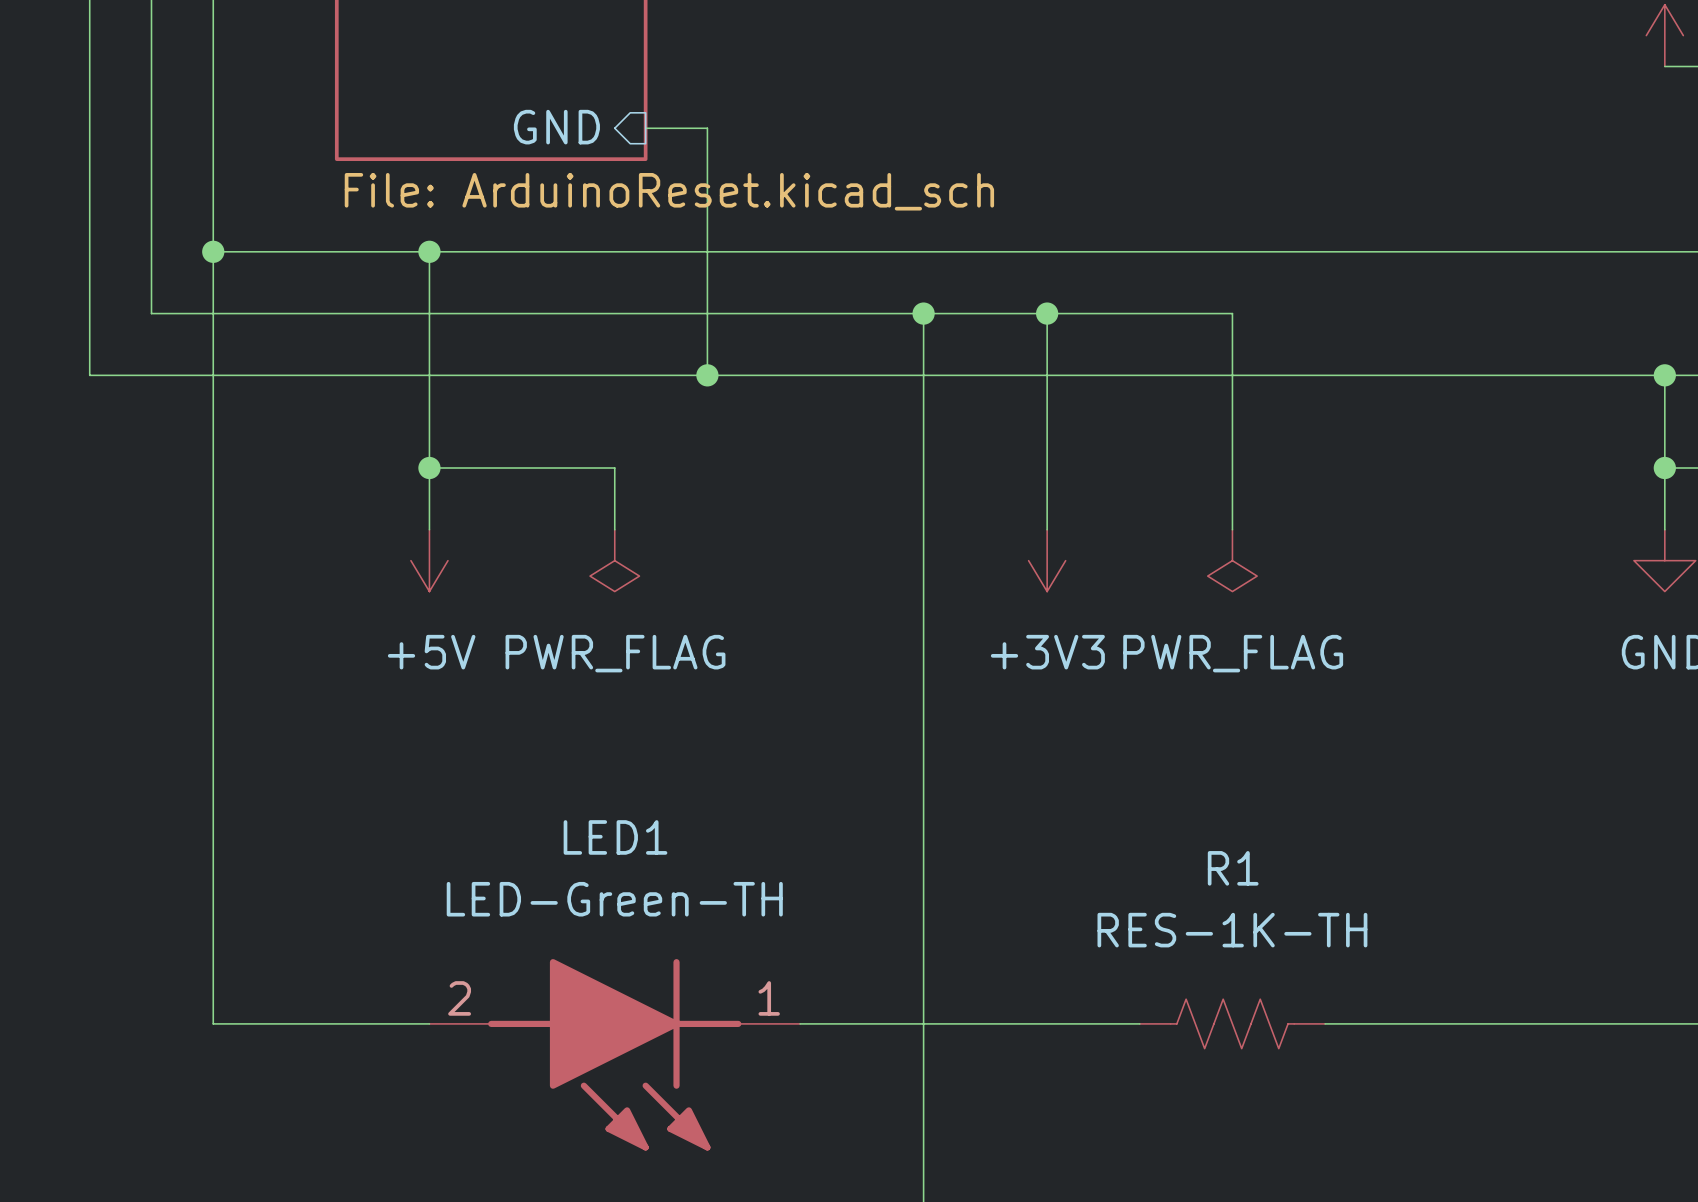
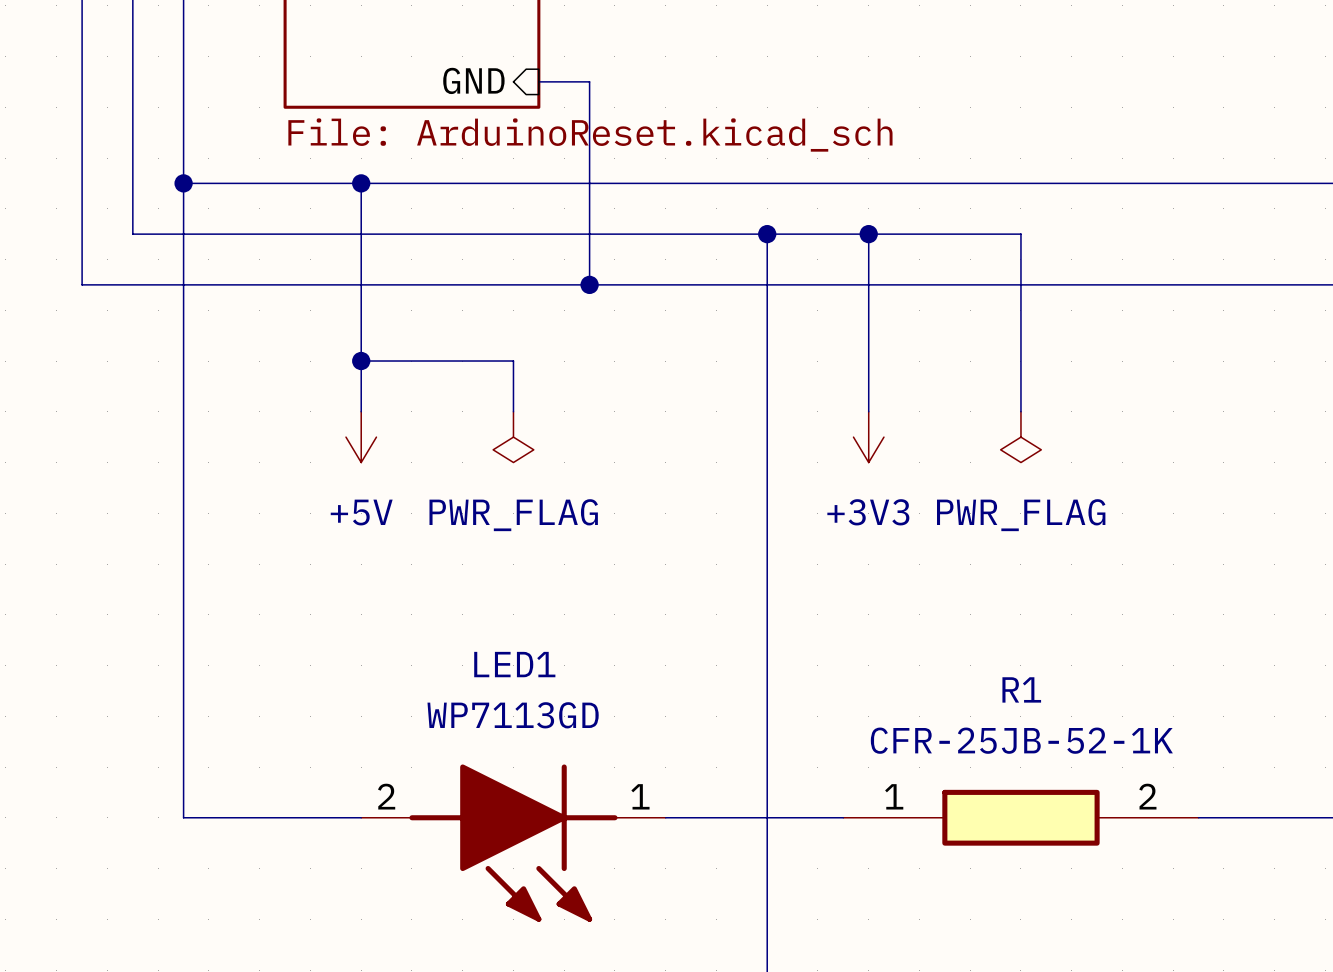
LED1 value: LED-Green-TH (614, 899) -> WP7113GD (513, 715)
R1 value: RES-1K-TH (1232, 930) -> CFR-25JB-52-1K (1021, 740)
R1 symbol: [1139, 999, 1326, 1049] -> [843, 789, 1199, 846]

